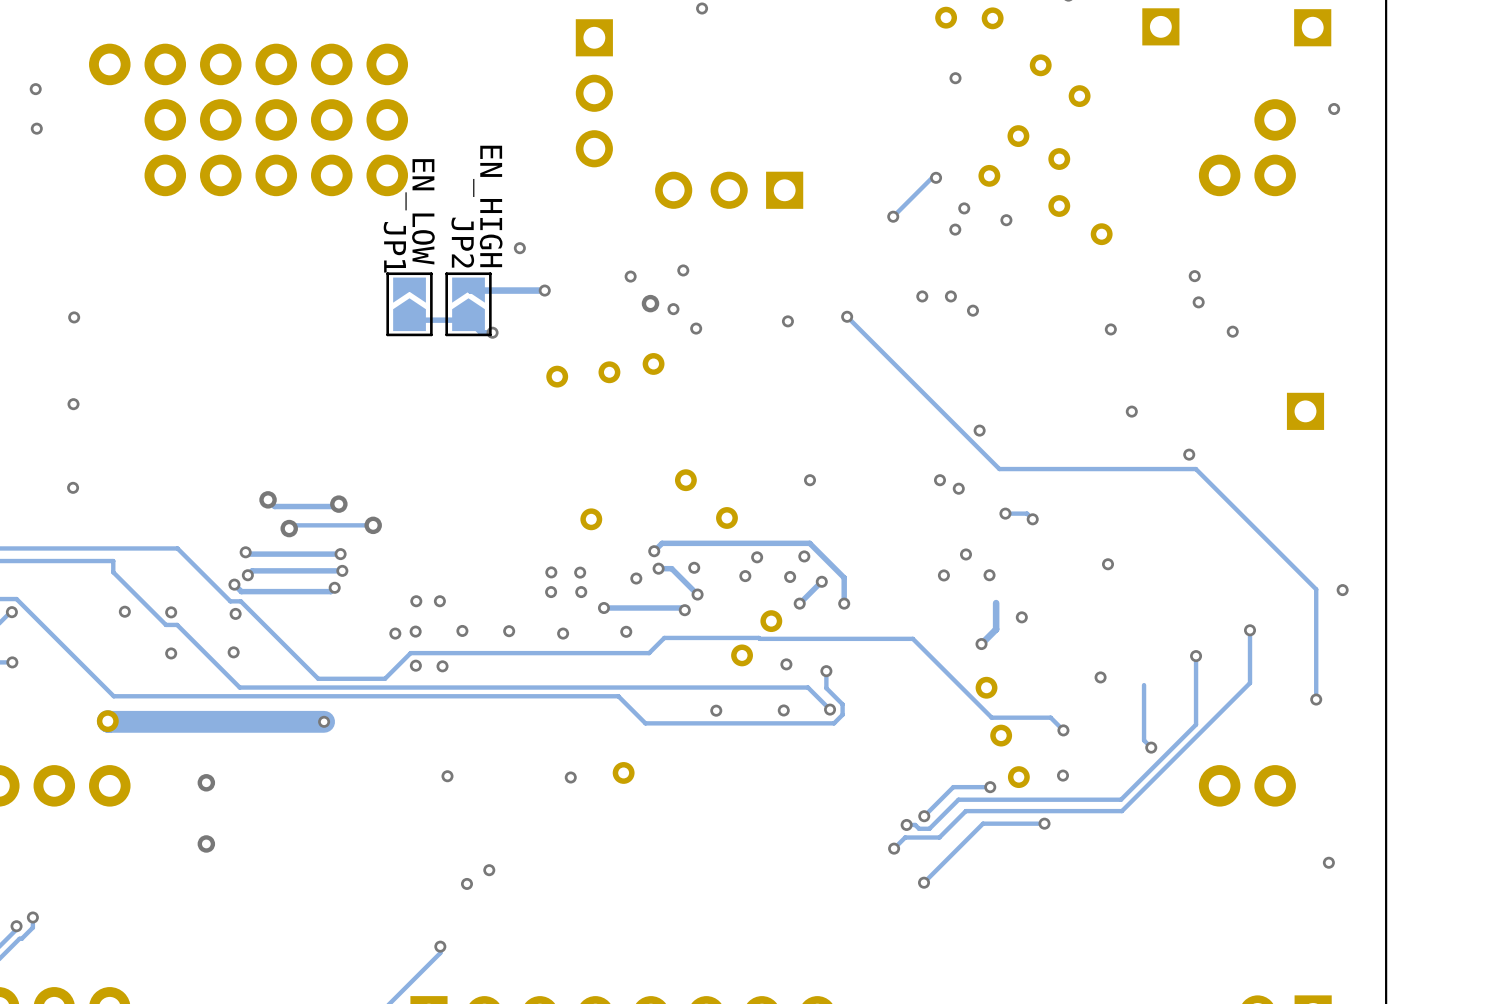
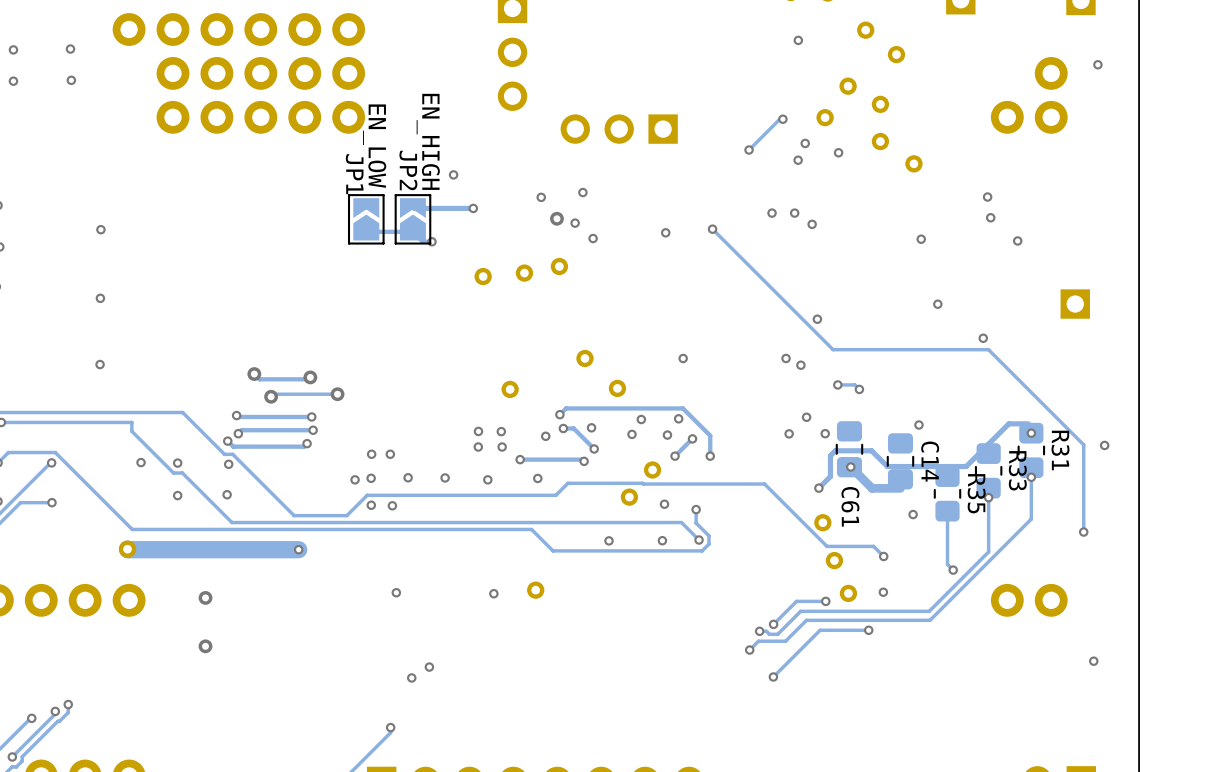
track: none -> (1028, 423) (1008, 423) (966, 466) (887, 466) (871, 450) (835, 450) (830, 455)
via: none -> (1031, 433)
C61: none -> (849, 449)
R31: none -> (1031, 450)
C14: none -> (900, 461)
track: none -> (850, 467) (872, 488) (900, 488)
R33: none -> (988, 470)
R35: none -> (947, 493)

